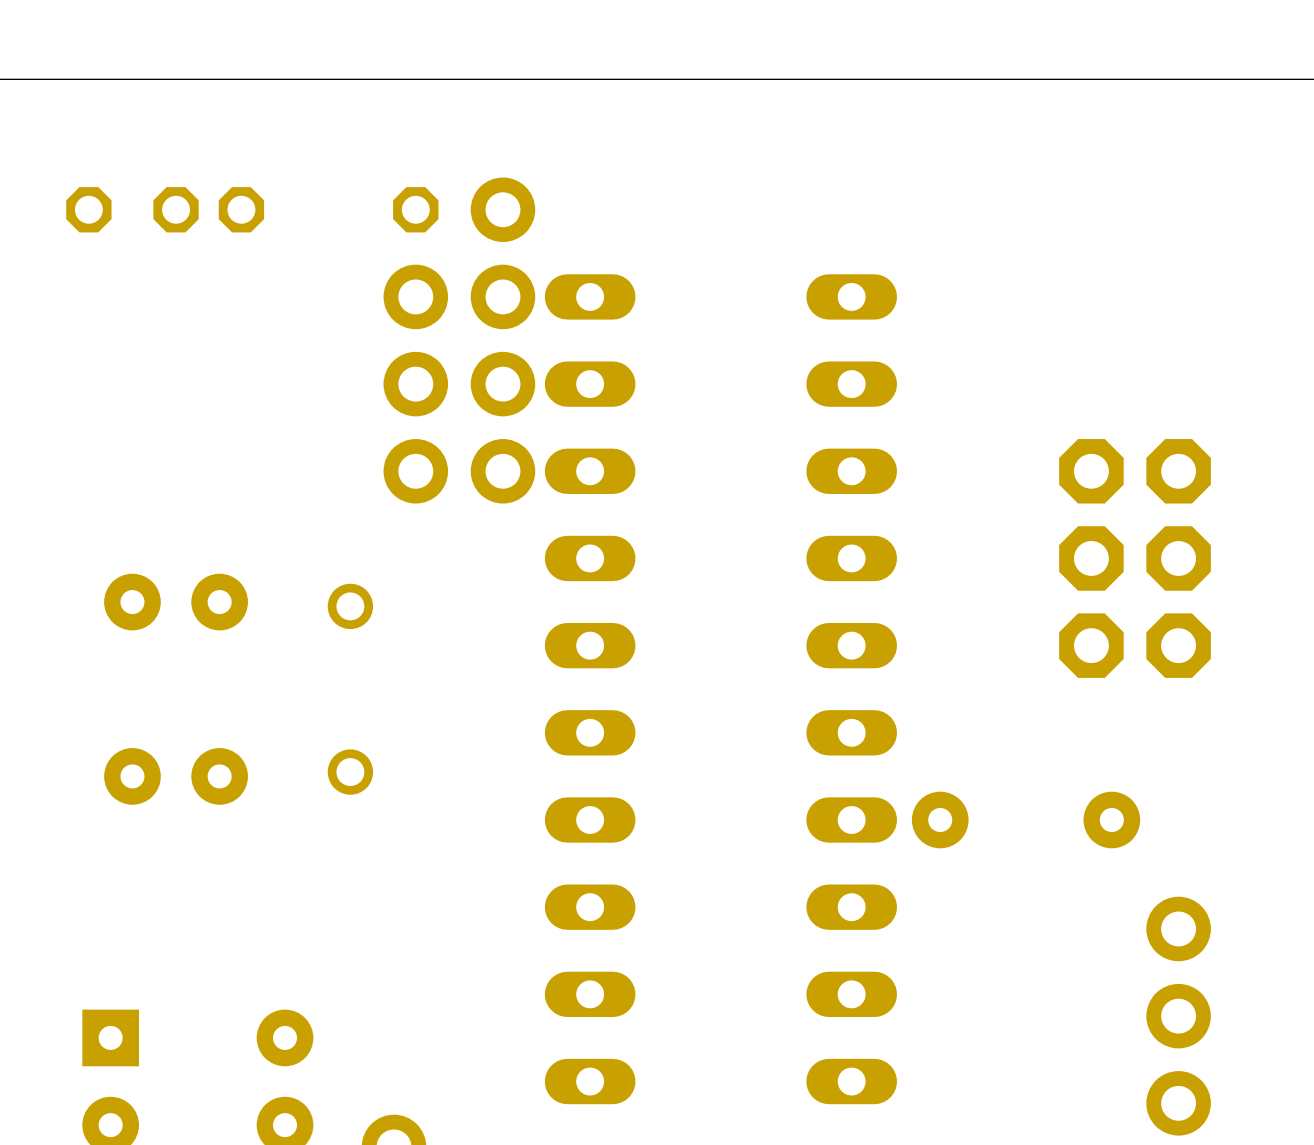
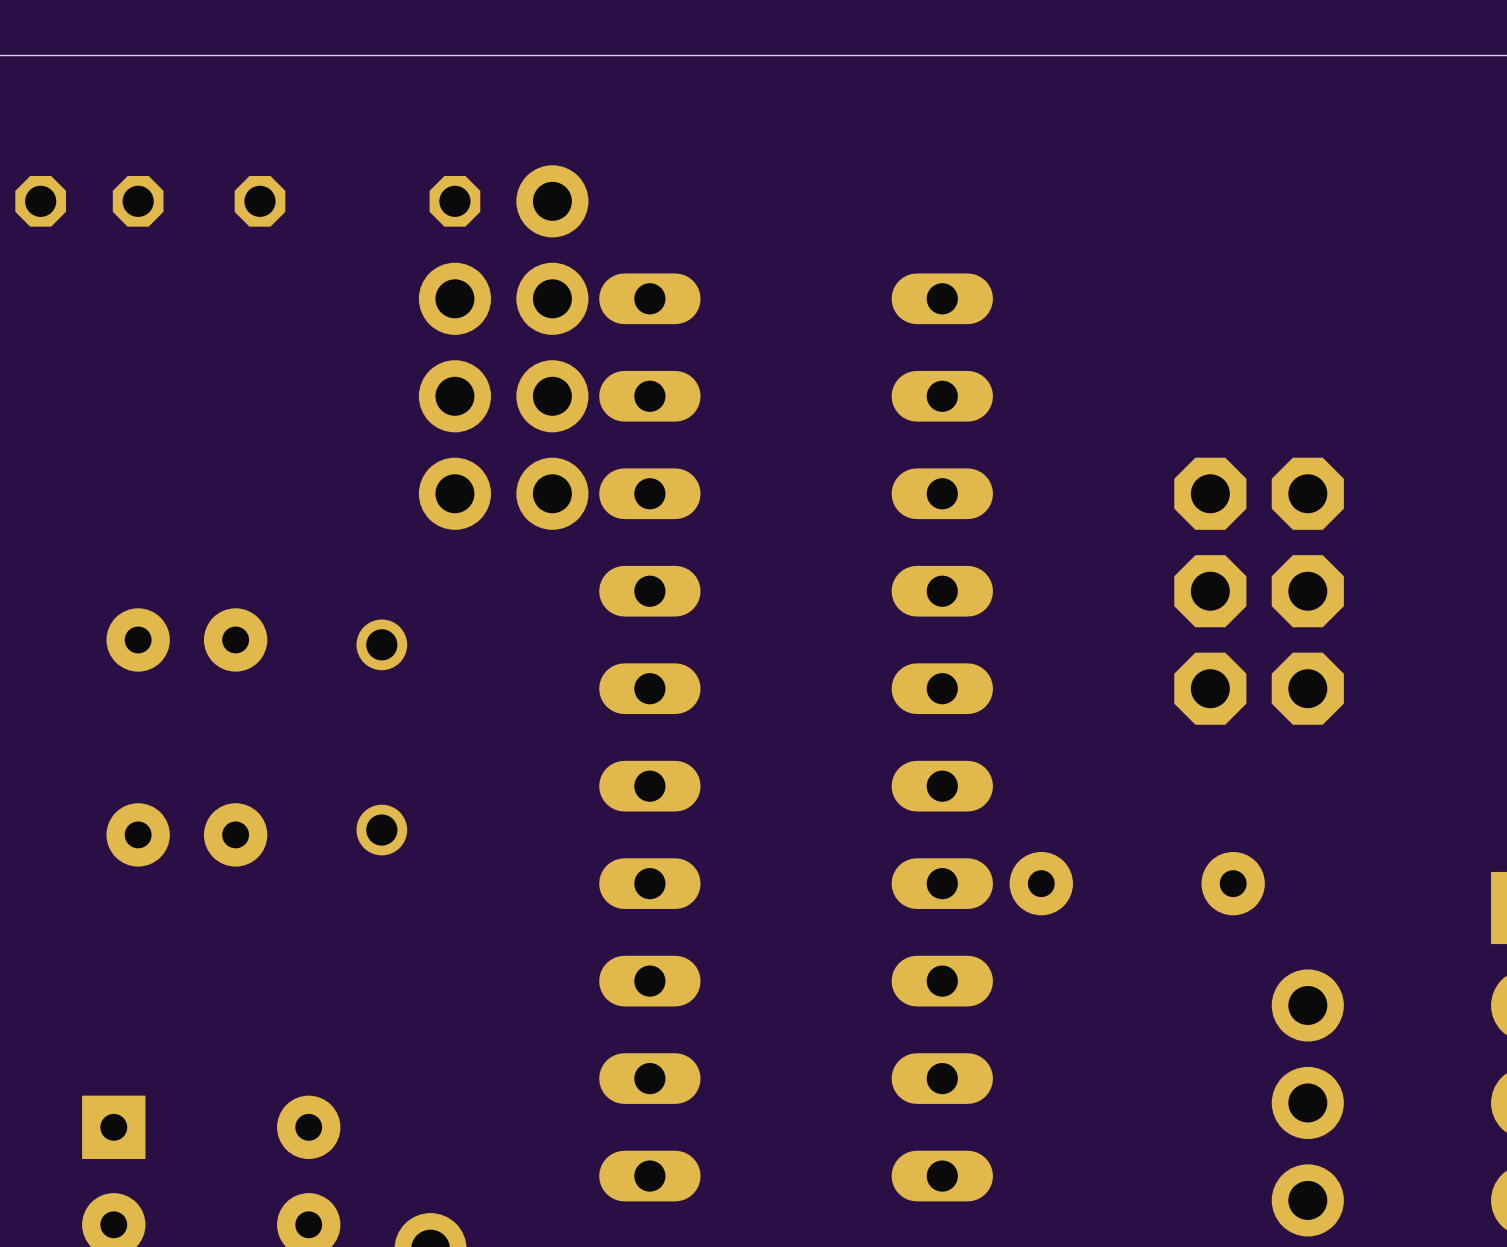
part position: (132, 209) -> (89, 201)

